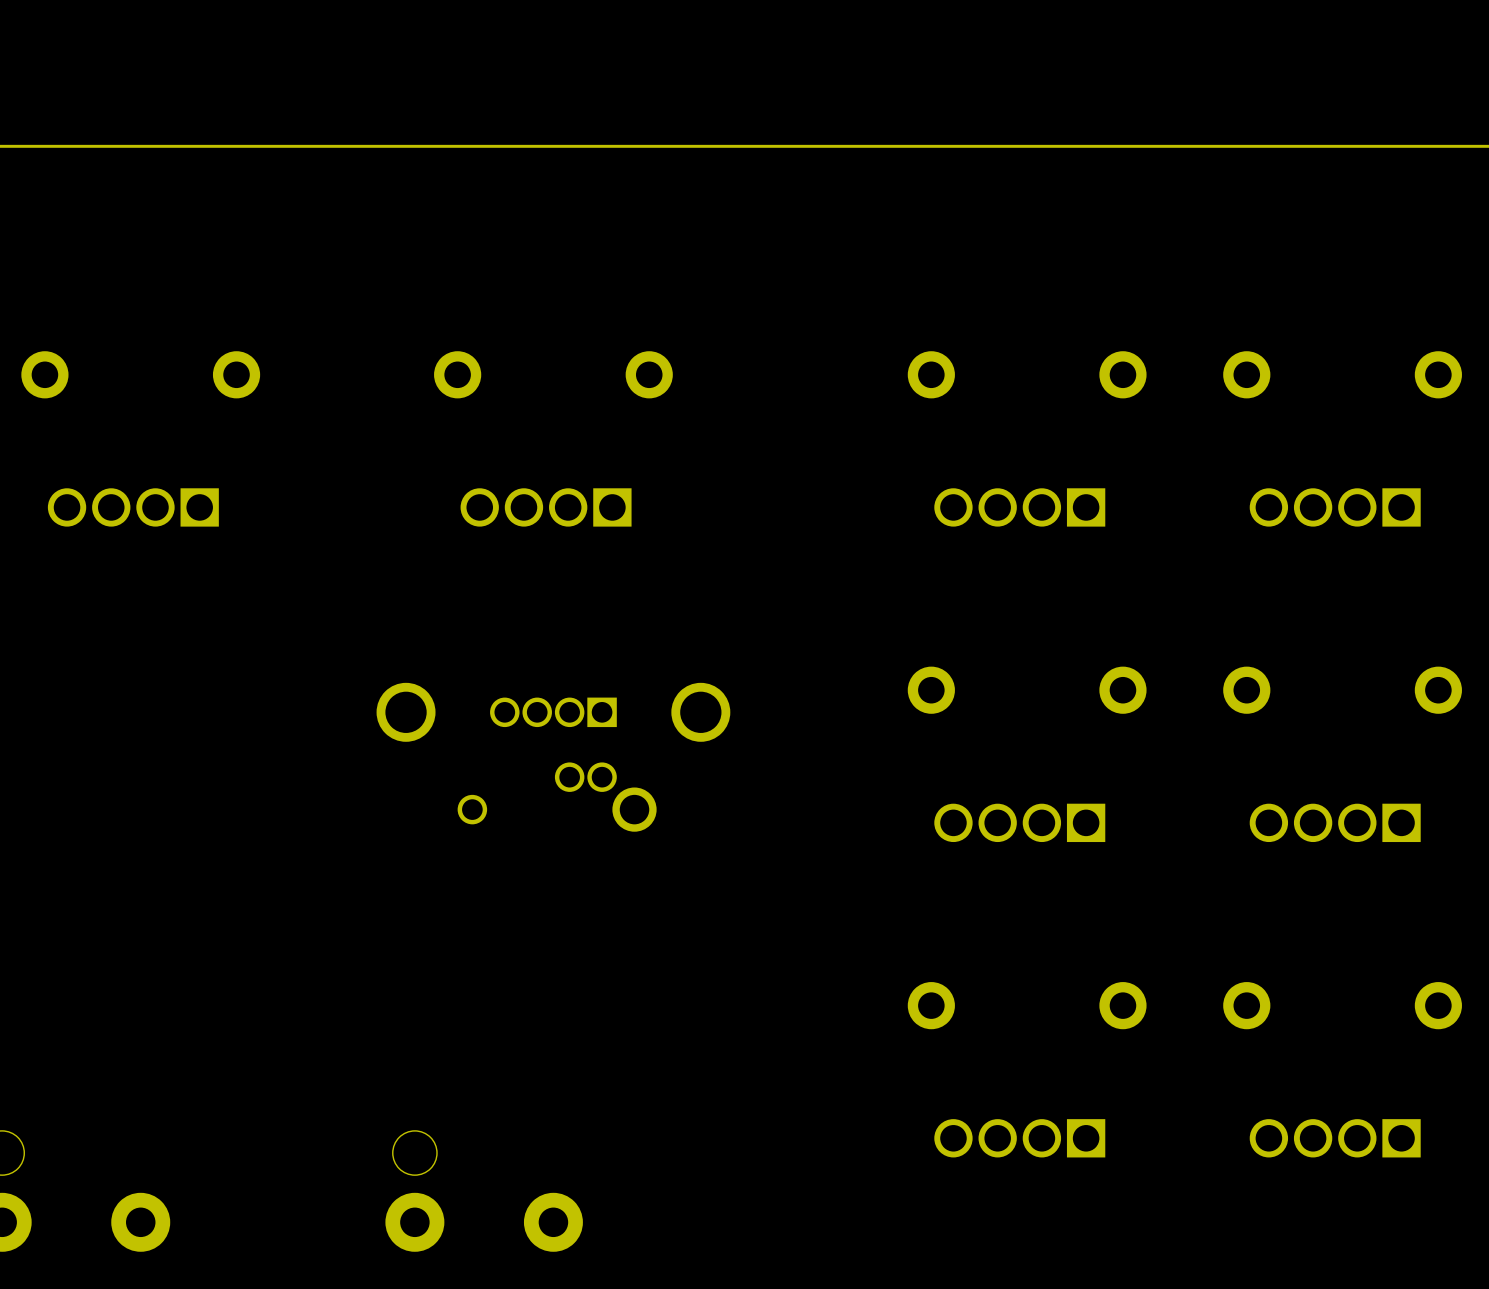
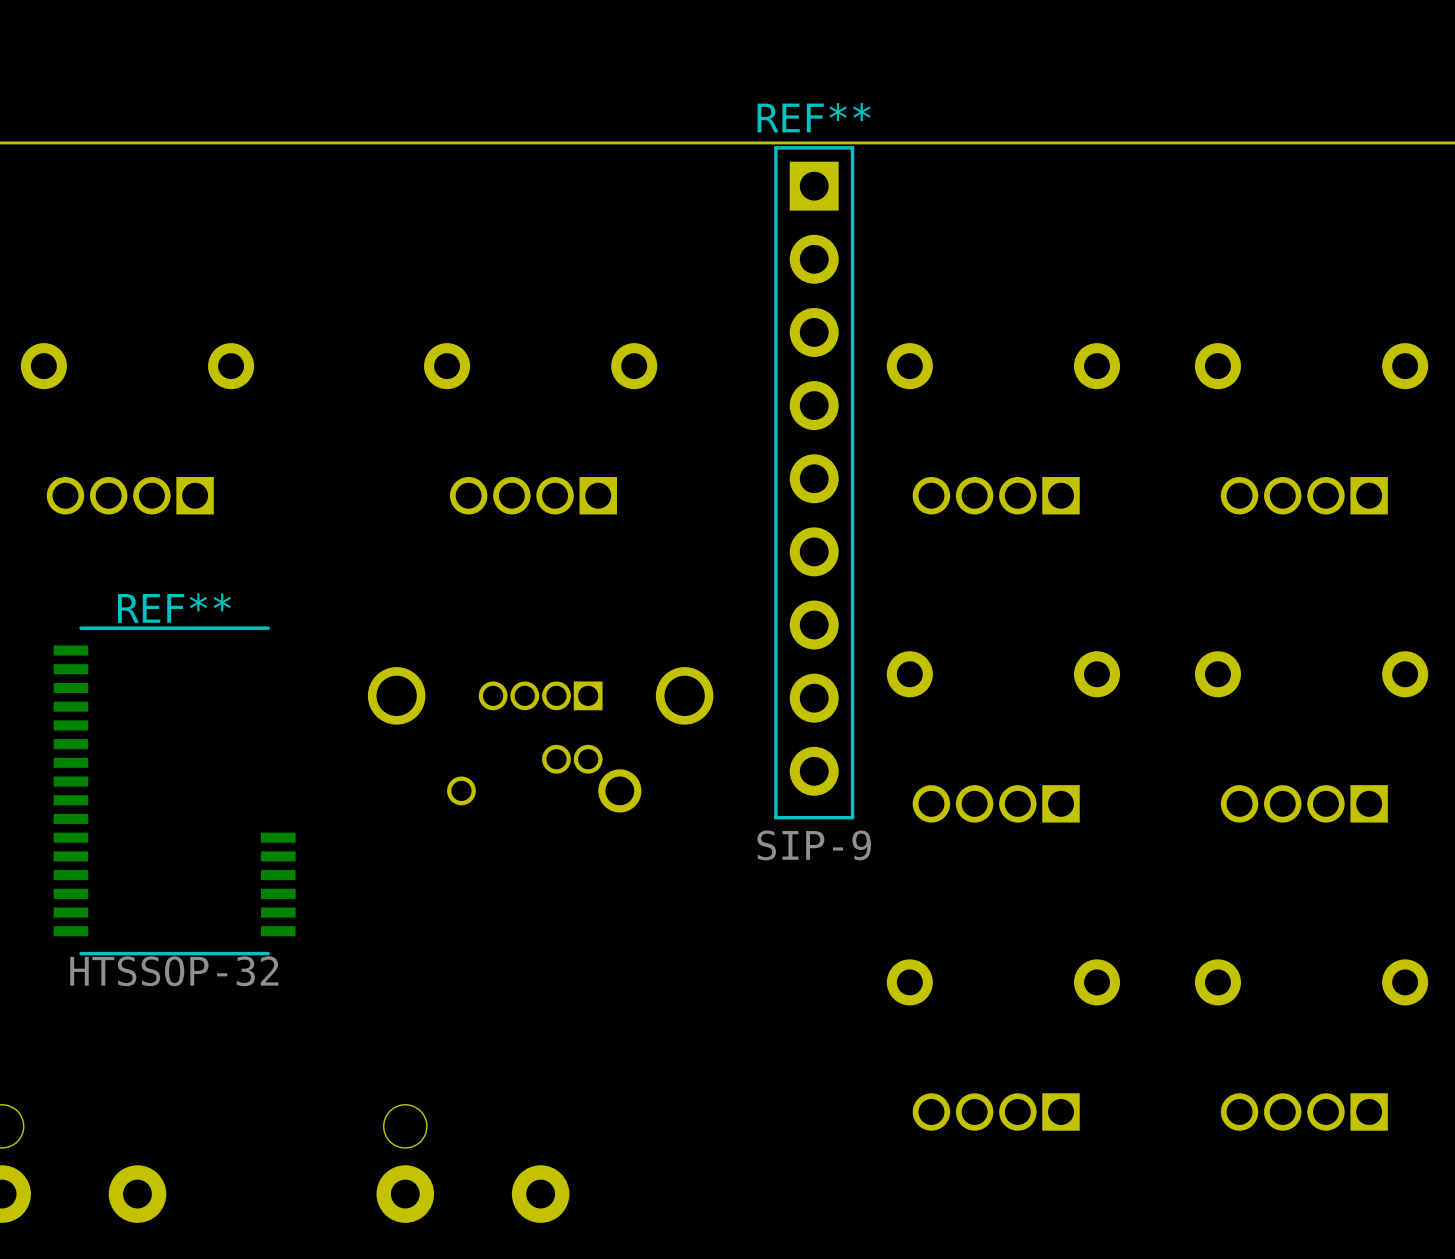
REF**: none -> SIP-9 (814, 482)
REF**: none -> HTSSOP-32 (174, 790)

